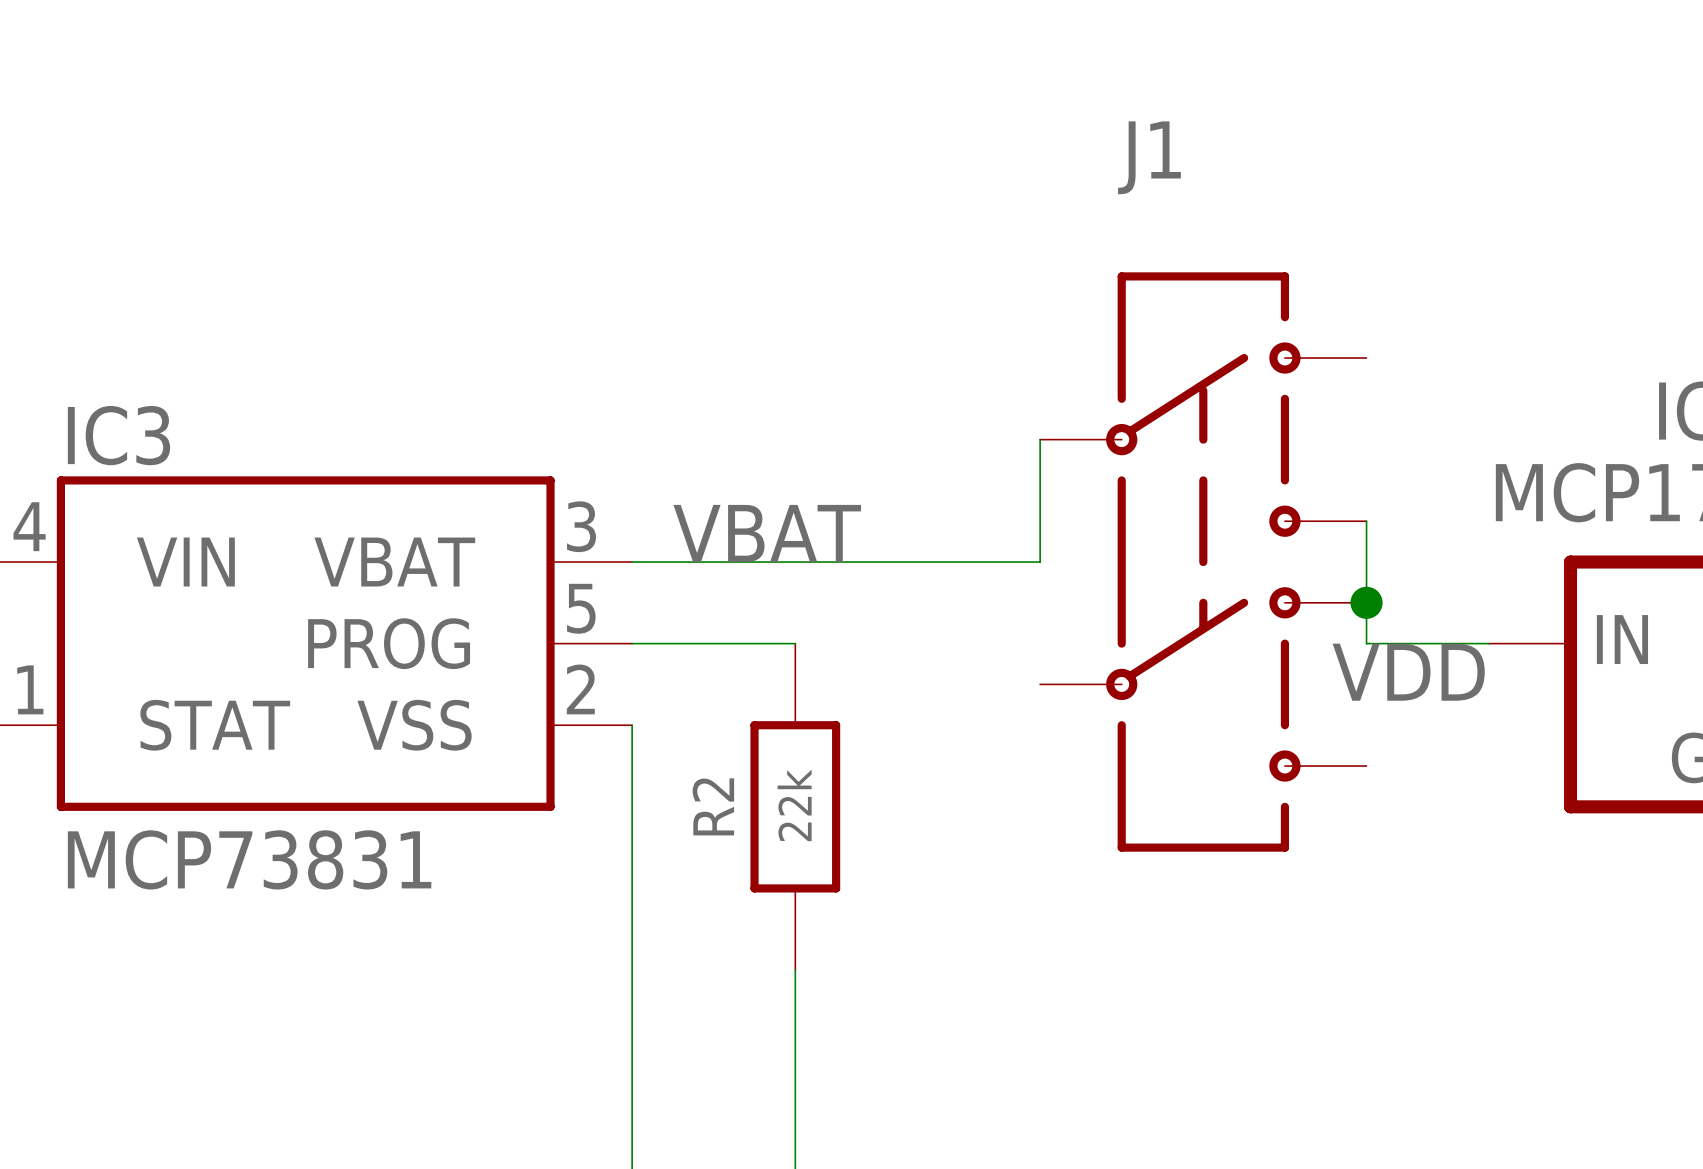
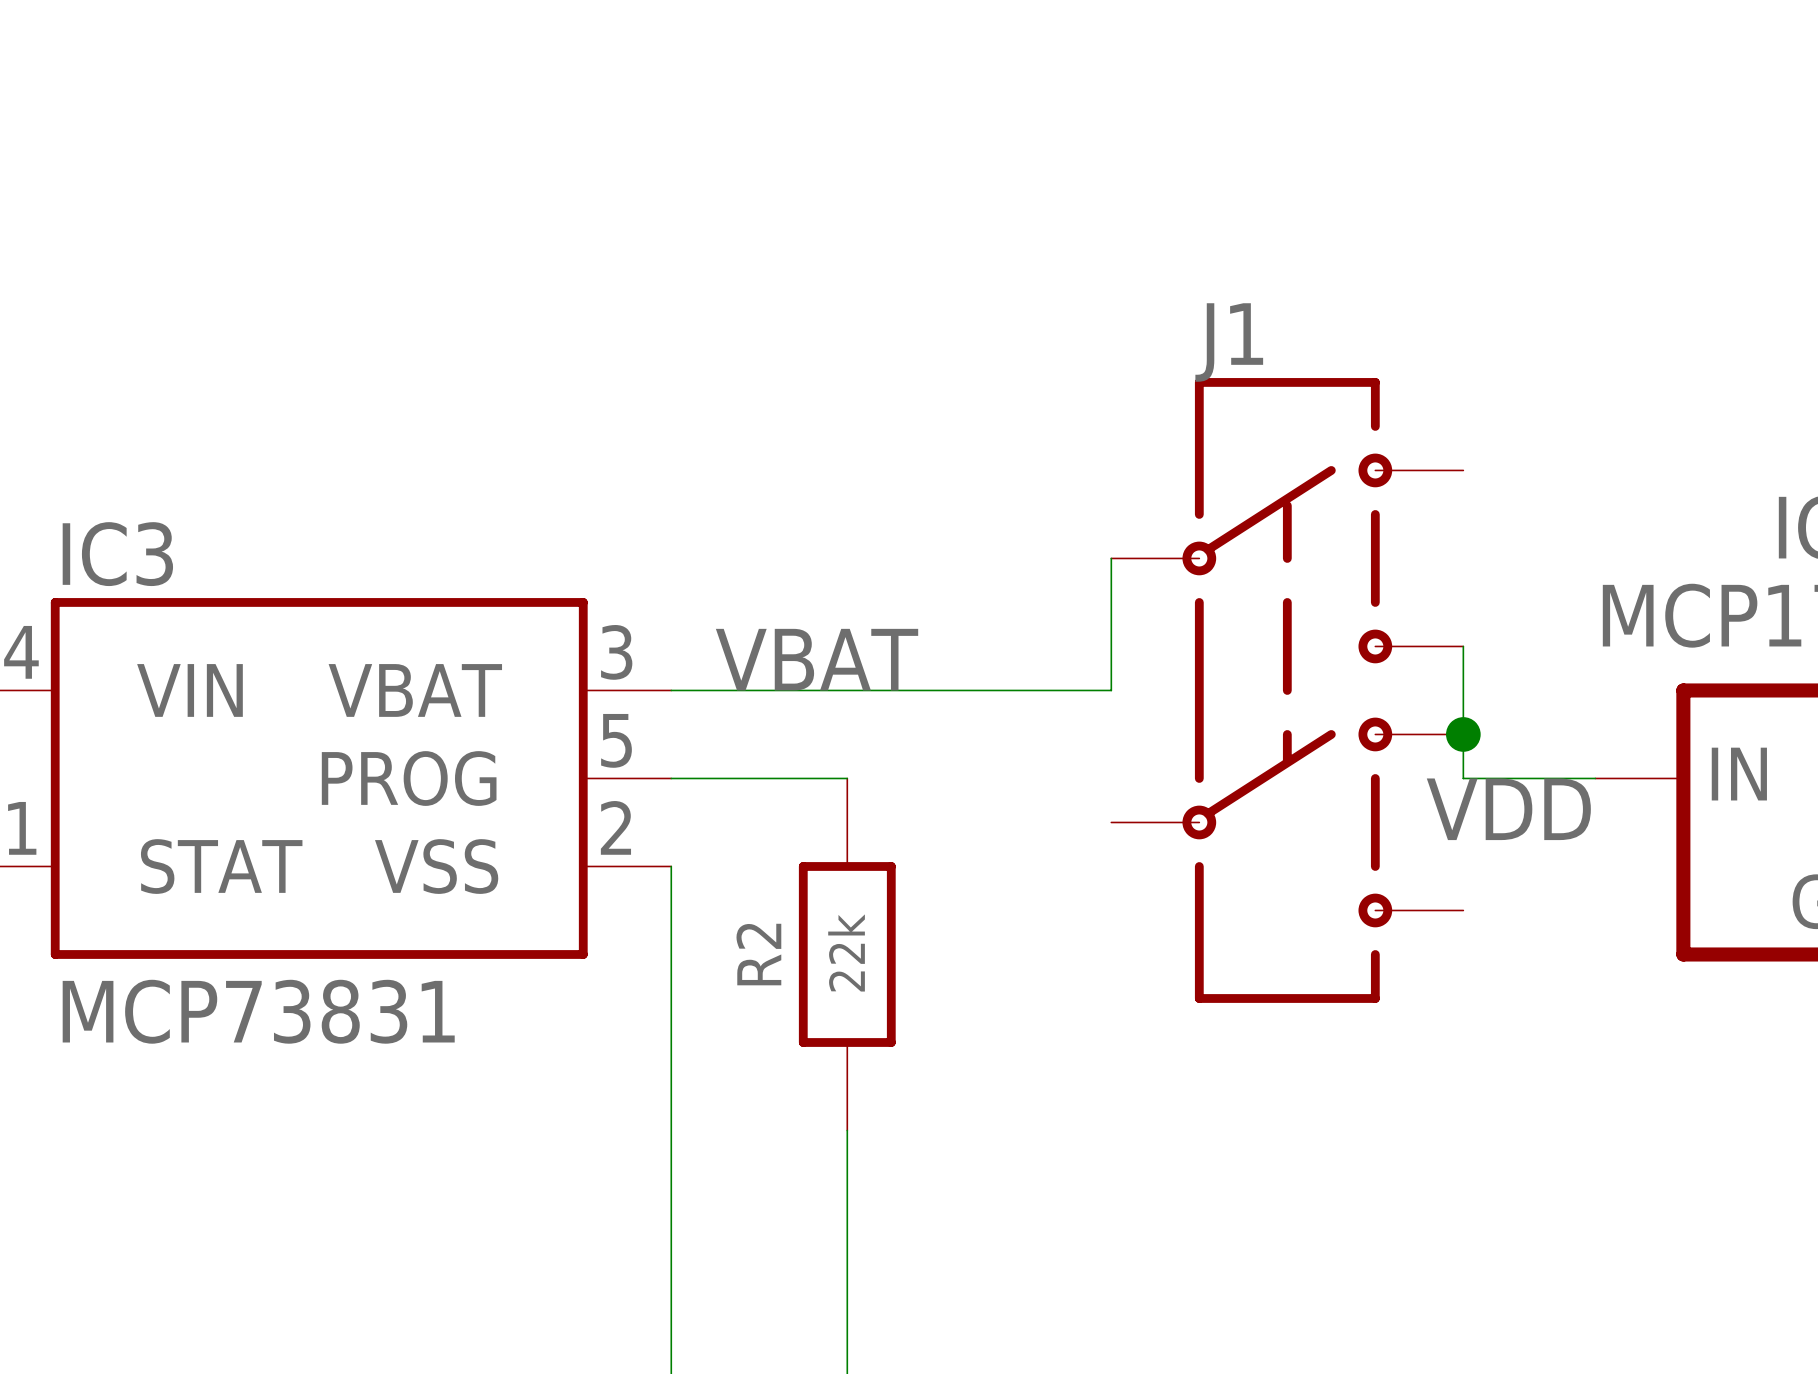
J1 name position: J1 (1149, 157) -> J1 (1229, 342)

